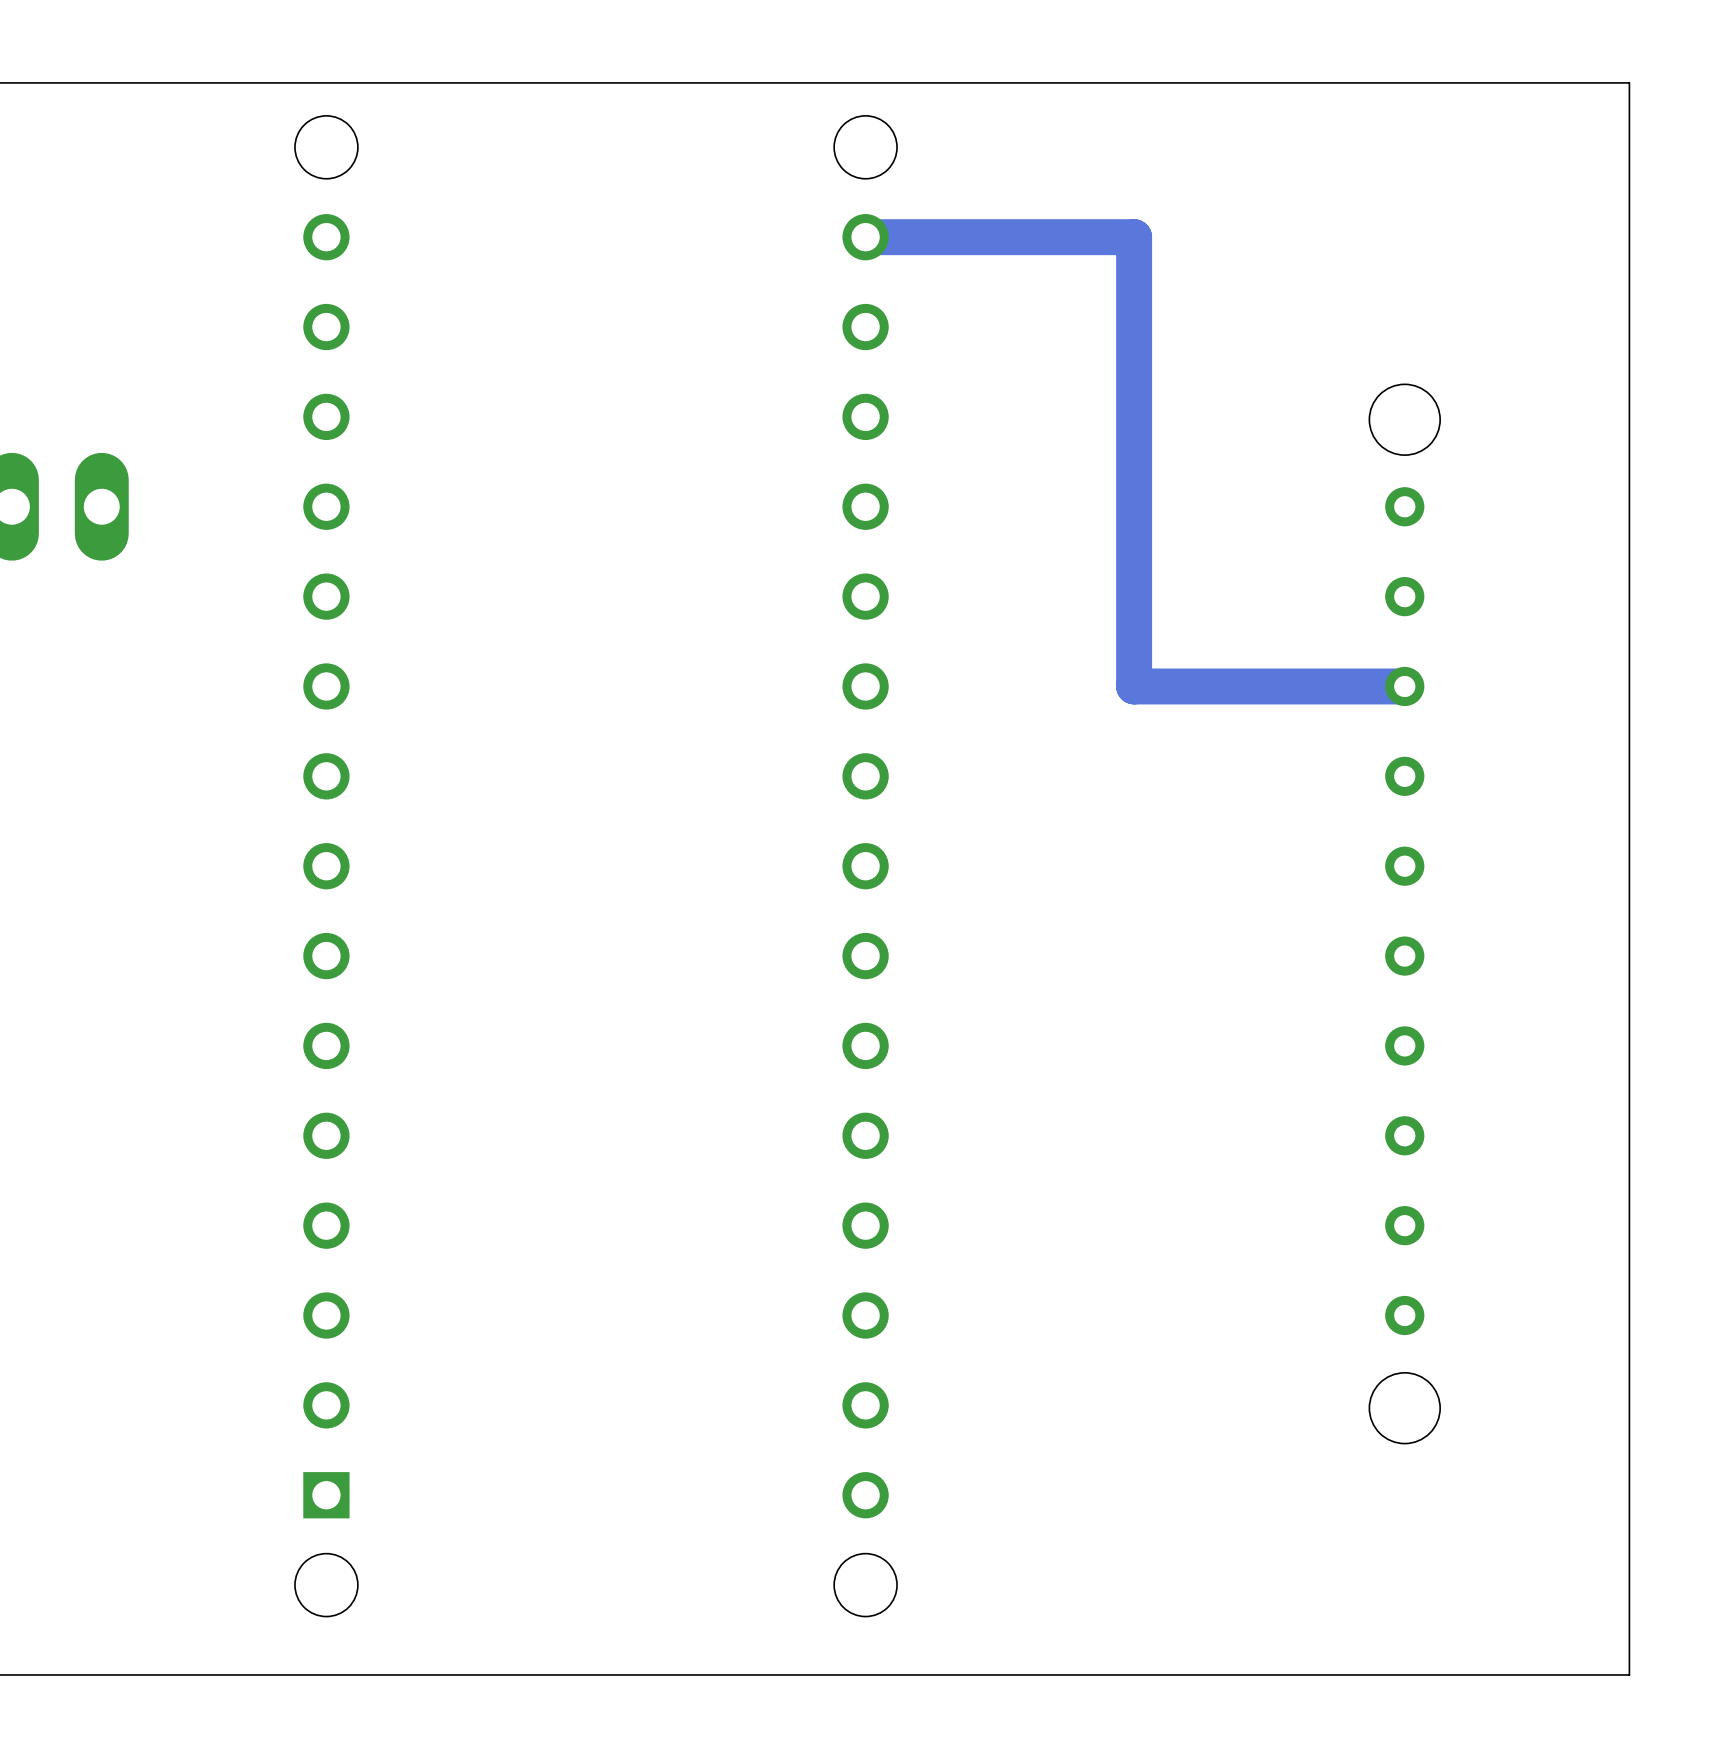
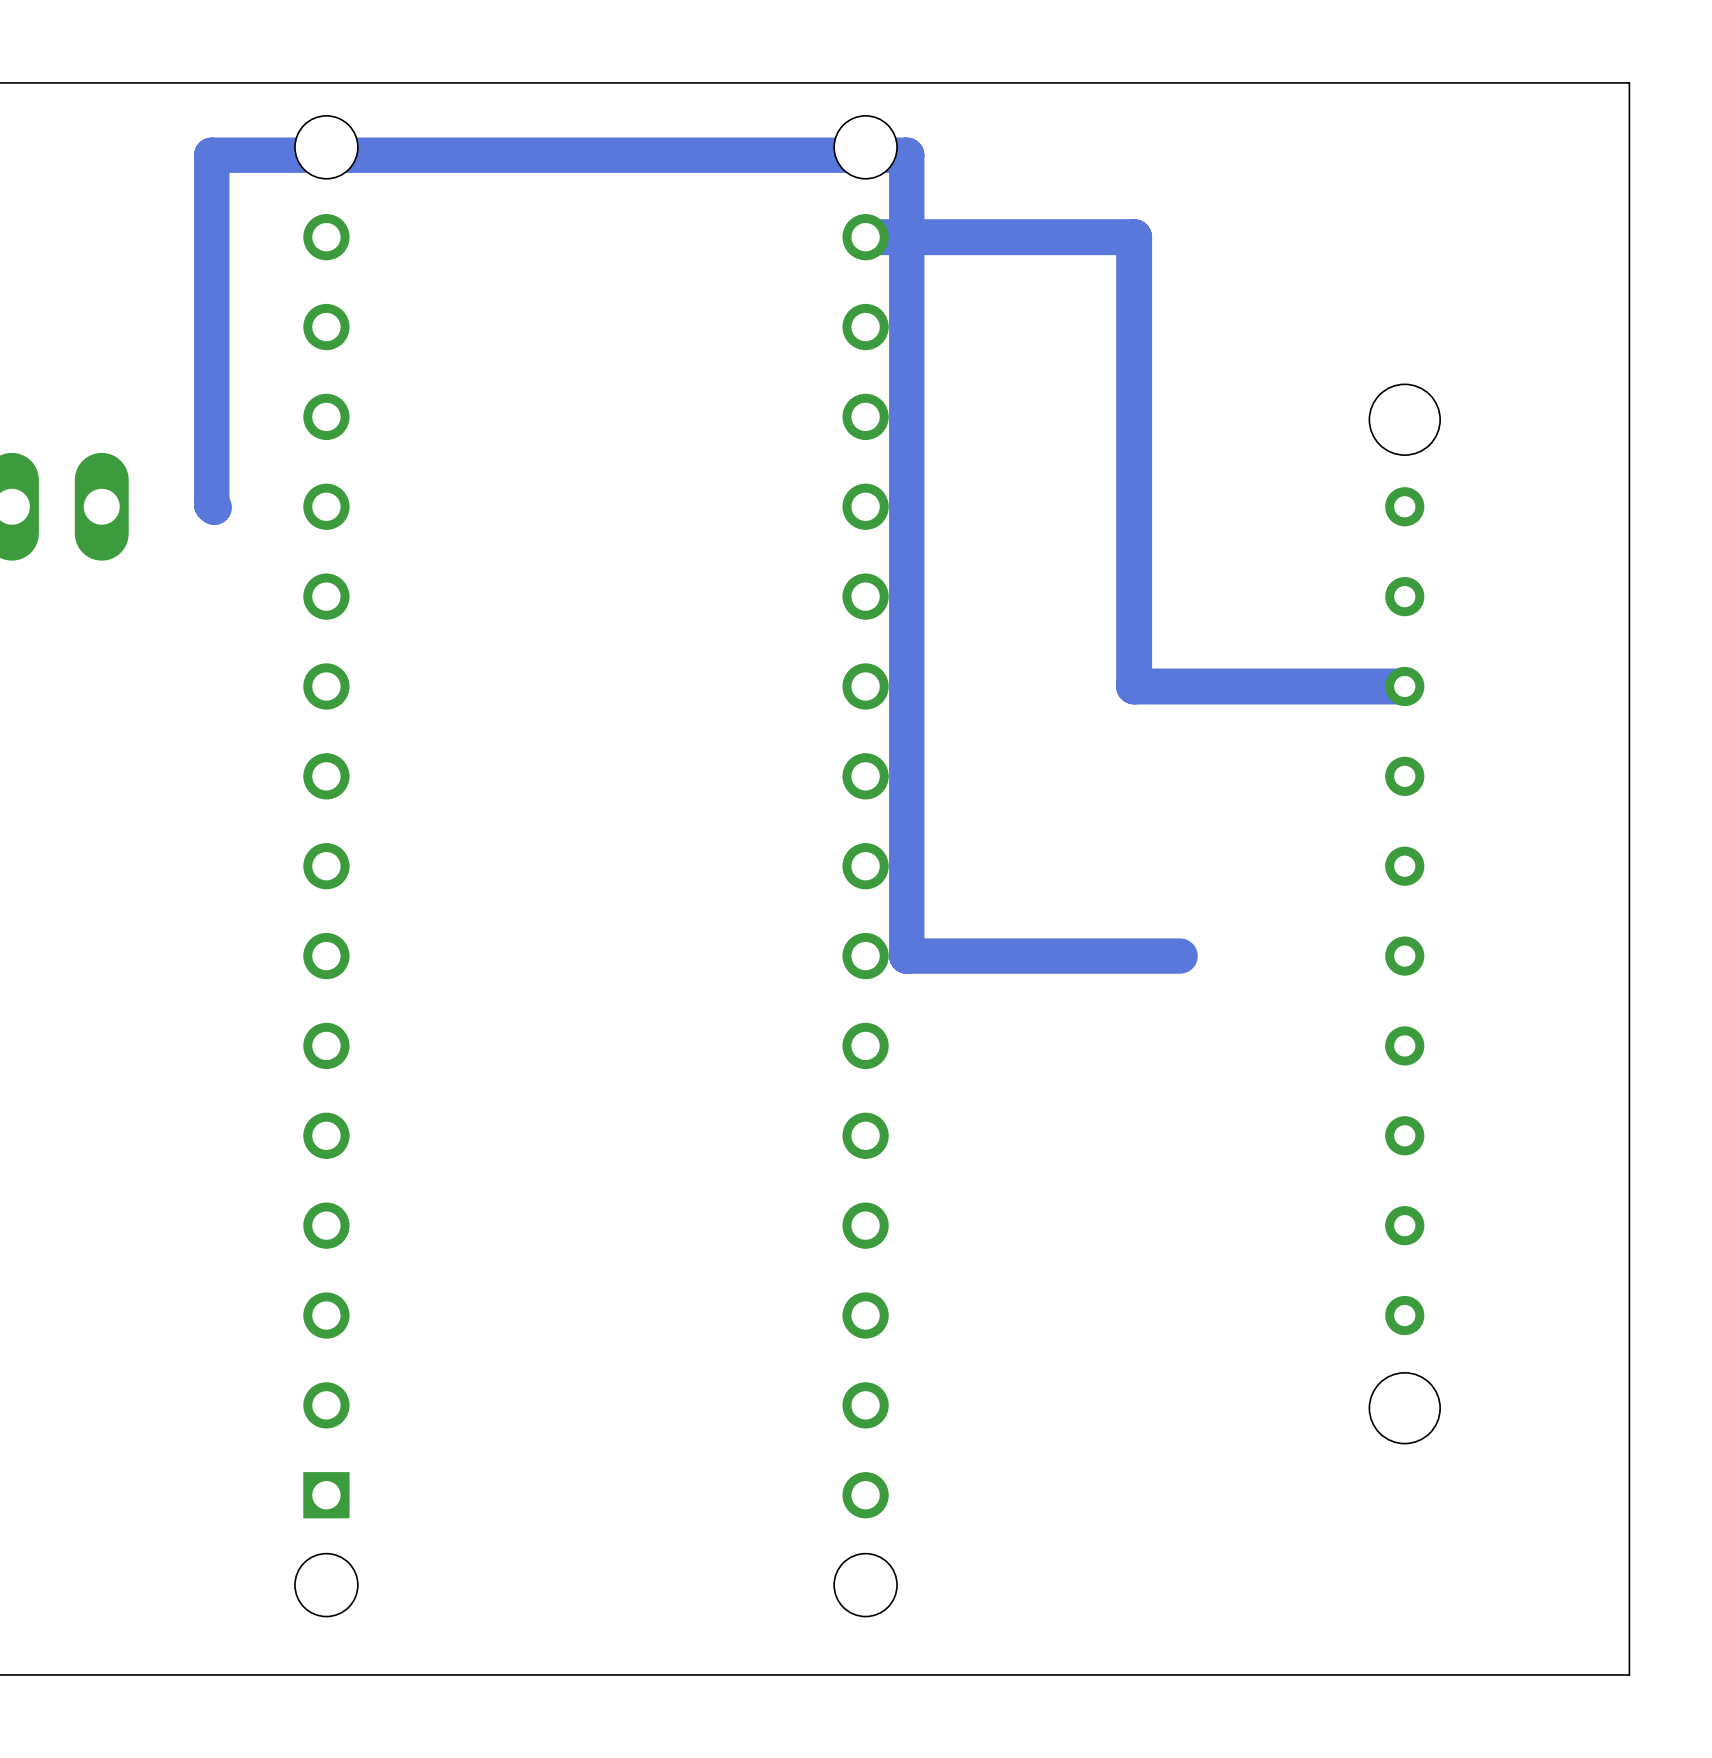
track: none -> (214, 507) (211, 504) (211, 155) (906, 155) (906, 956) (1180, 956)

